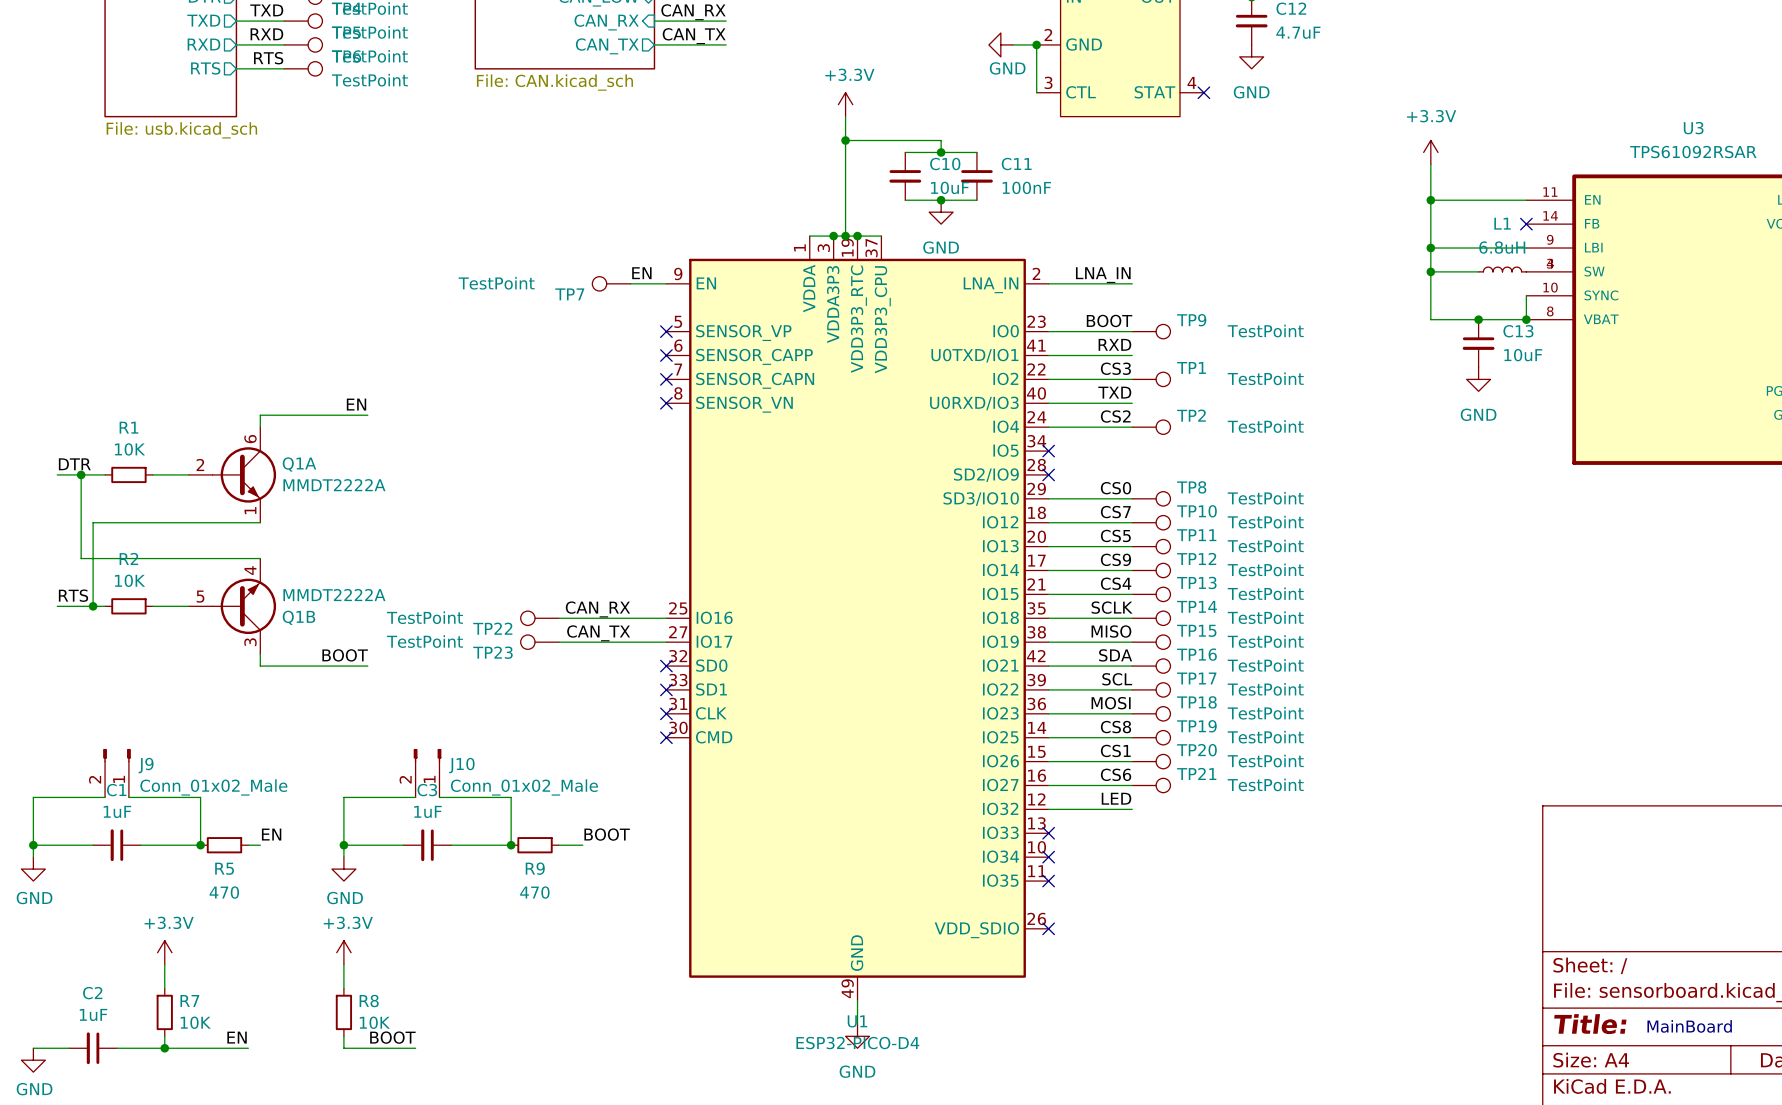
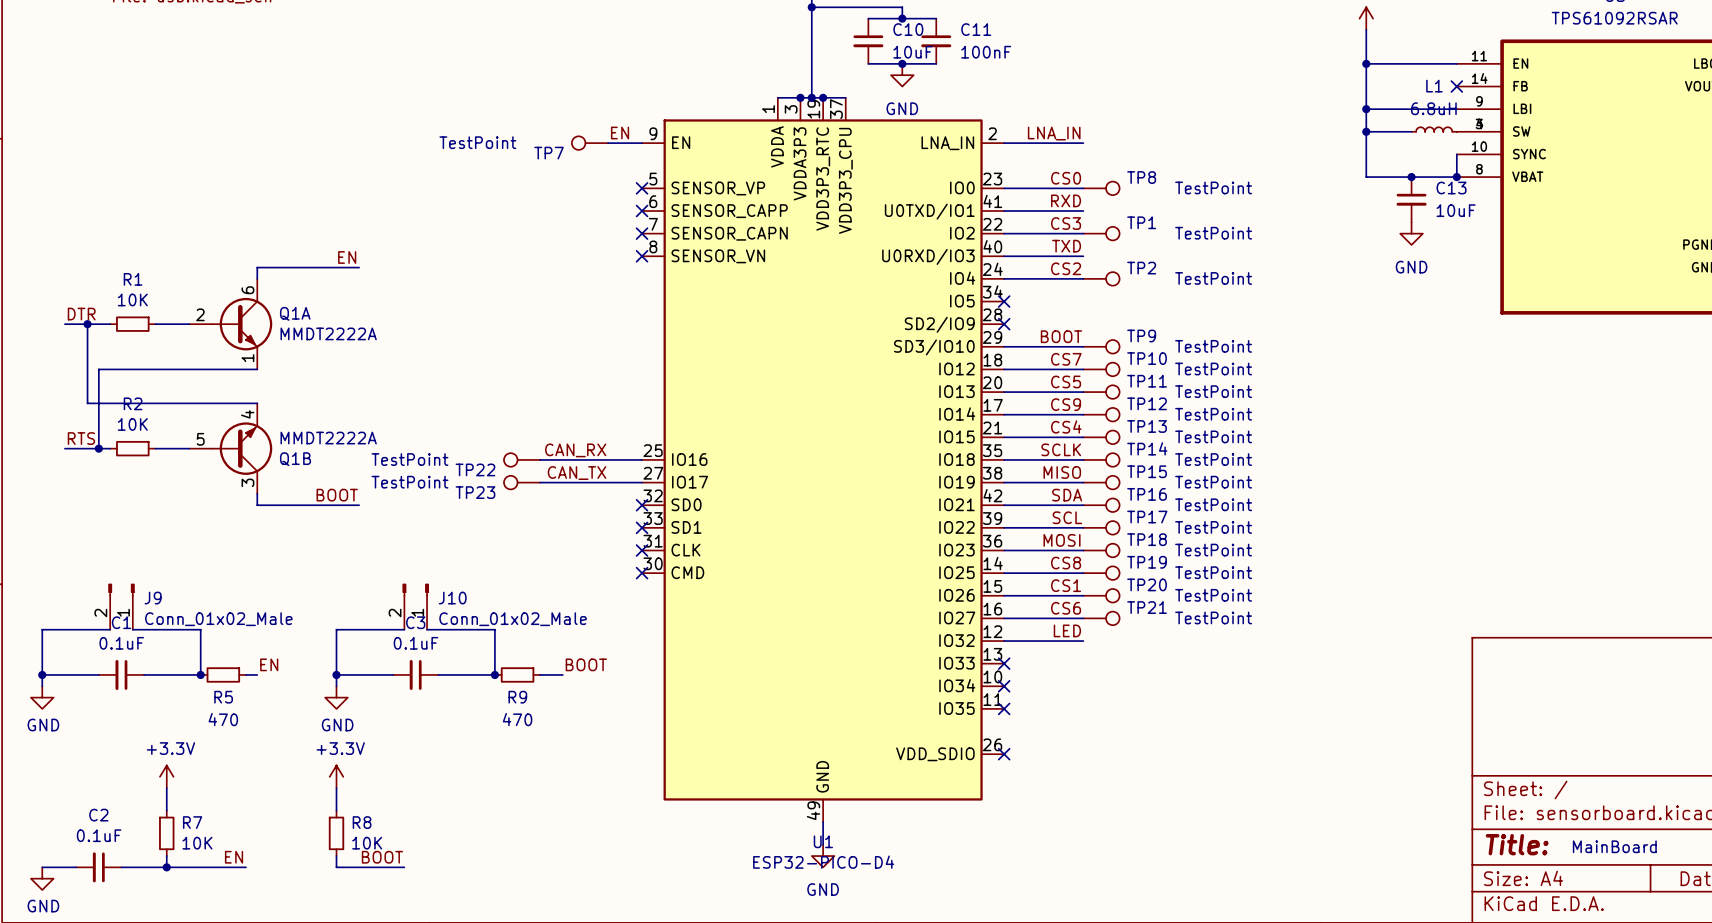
label: BOOT (1109, 320) -> CS0 (1066, 178)
TP9 name: TP9 (1191, 320) -> TP8 (1141, 177)
TP8 name: TP8 (1191, 487) -> TP9 (1141, 335)
label: CS0 (1116, 488) -> BOOT (1061, 336)
C1 value: 1uF (117, 811) -> 0.1uF (121, 643)
C3 value: 1uF (427, 811) -> 0.1uF (415, 643)
C2 value: 1uF (93, 1014) -> 0.1uF (99, 835)

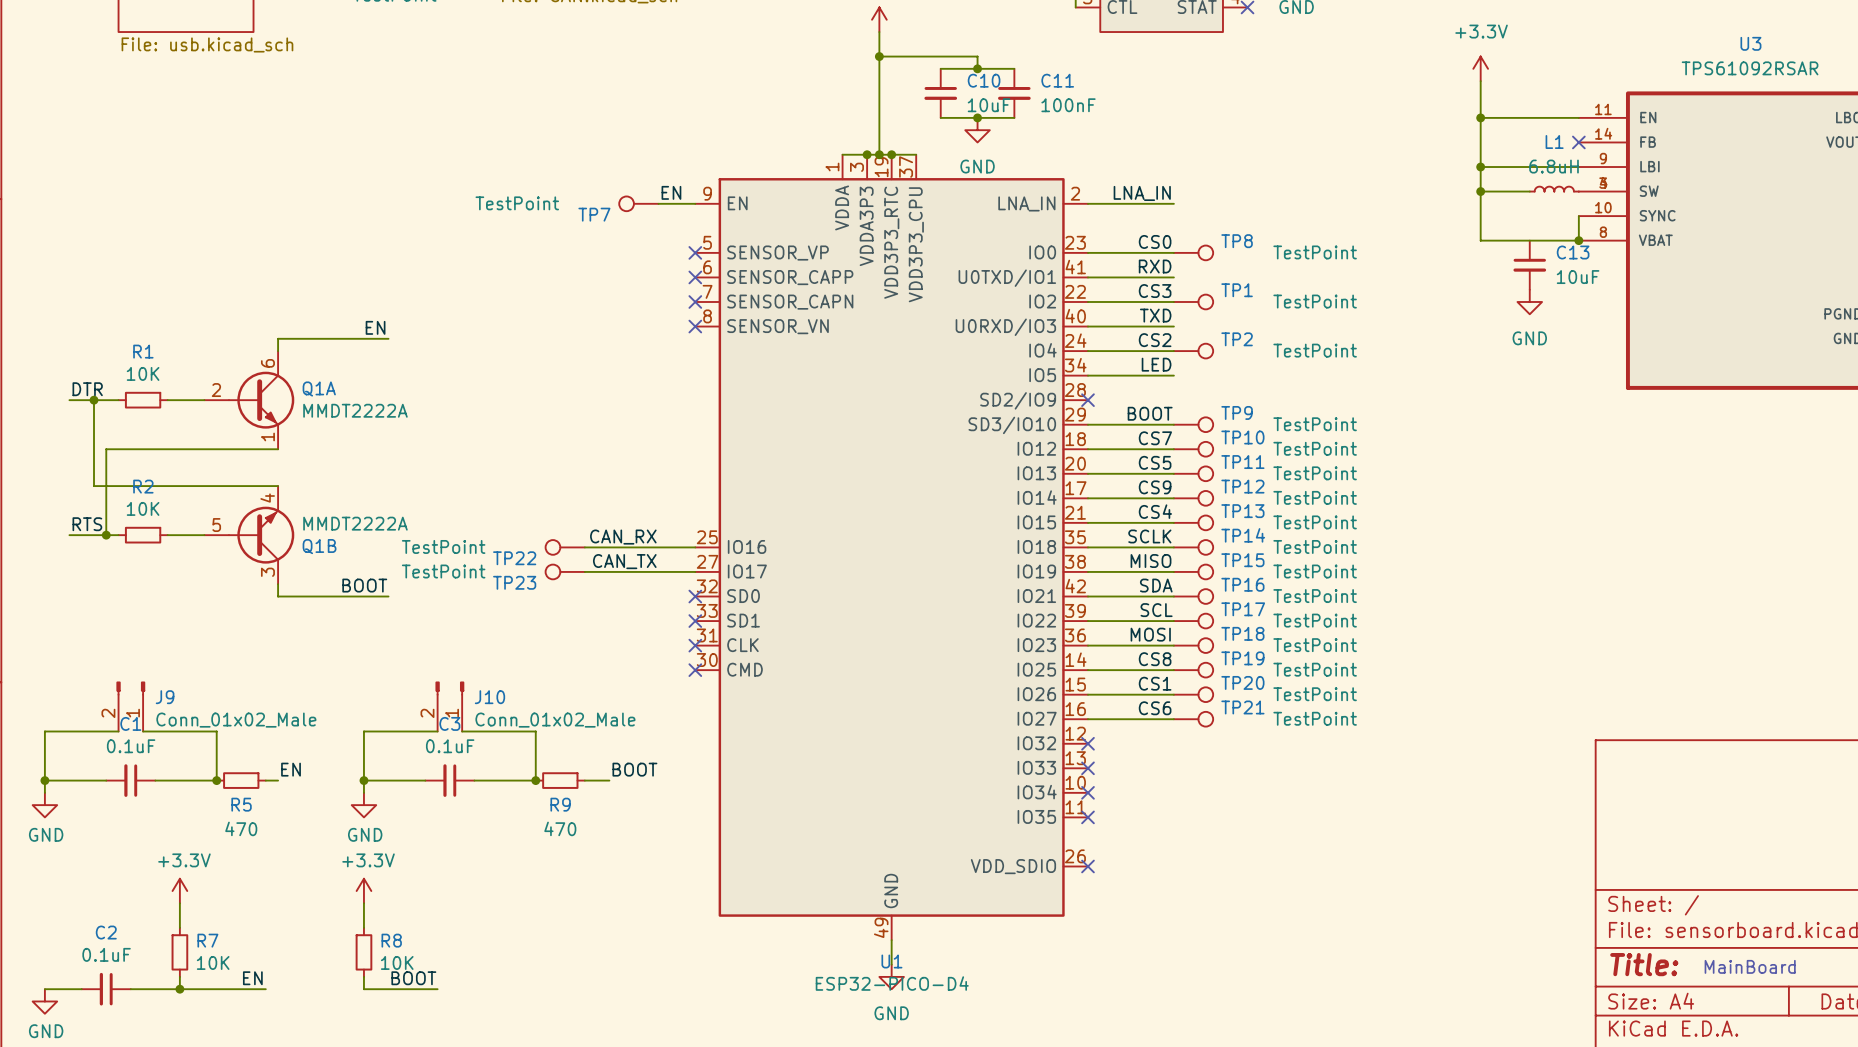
junction: (1411, 177) -> none
label: none -> LED (1156, 364)
wire: none -> (1087, 375) (1173, 375)
no-connect mark: (1004, 301) -> none
label: LED (1067, 630) -> none
wire: (1004, 641) (1083, 641) -> none
no-connect mark: none -> (1087, 743)

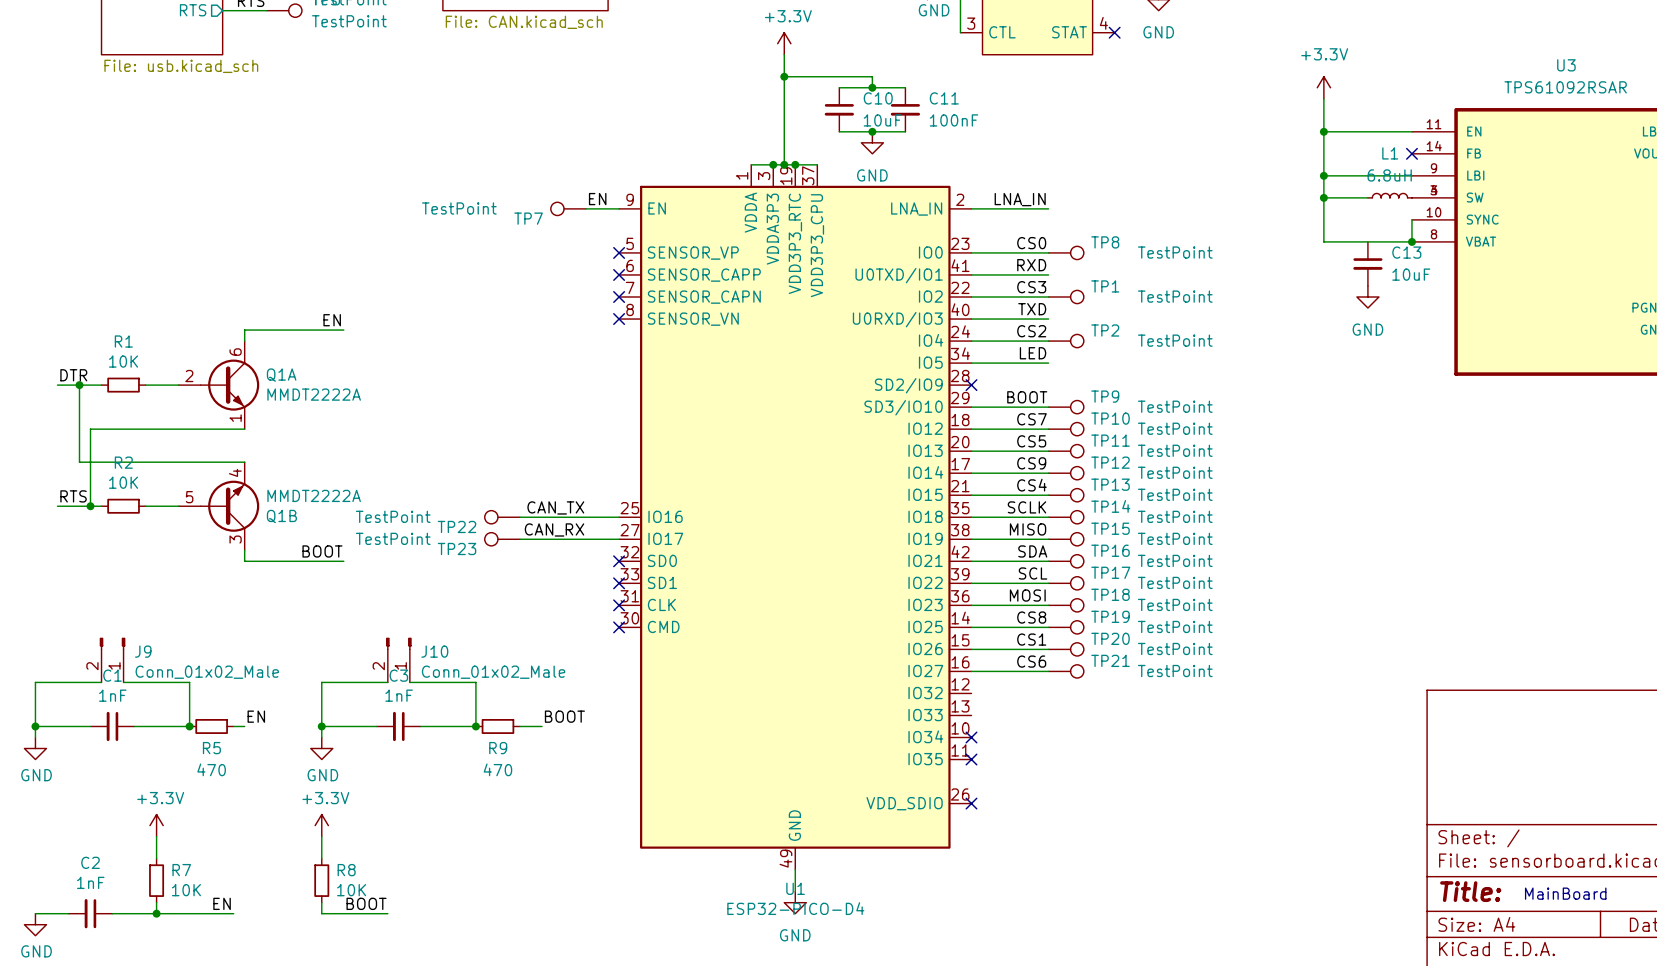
label: CAN_RX (623, 537) -> CAN_TX (555, 507)
label: CAN_TX (624, 561) -> CAN_RX (554, 529)
no-connect mark: (1087, 743) -> none
C1 value: 0.1uF (131, 746) -> 1nF (112, 695)
C3 value: 0.1uF (450, 746) -> 1nF (399, 695)
no-connect mark: (1087, 768) -> none
C2 value: 0.1uF (106, 954) -> 1nF (90, 882)

